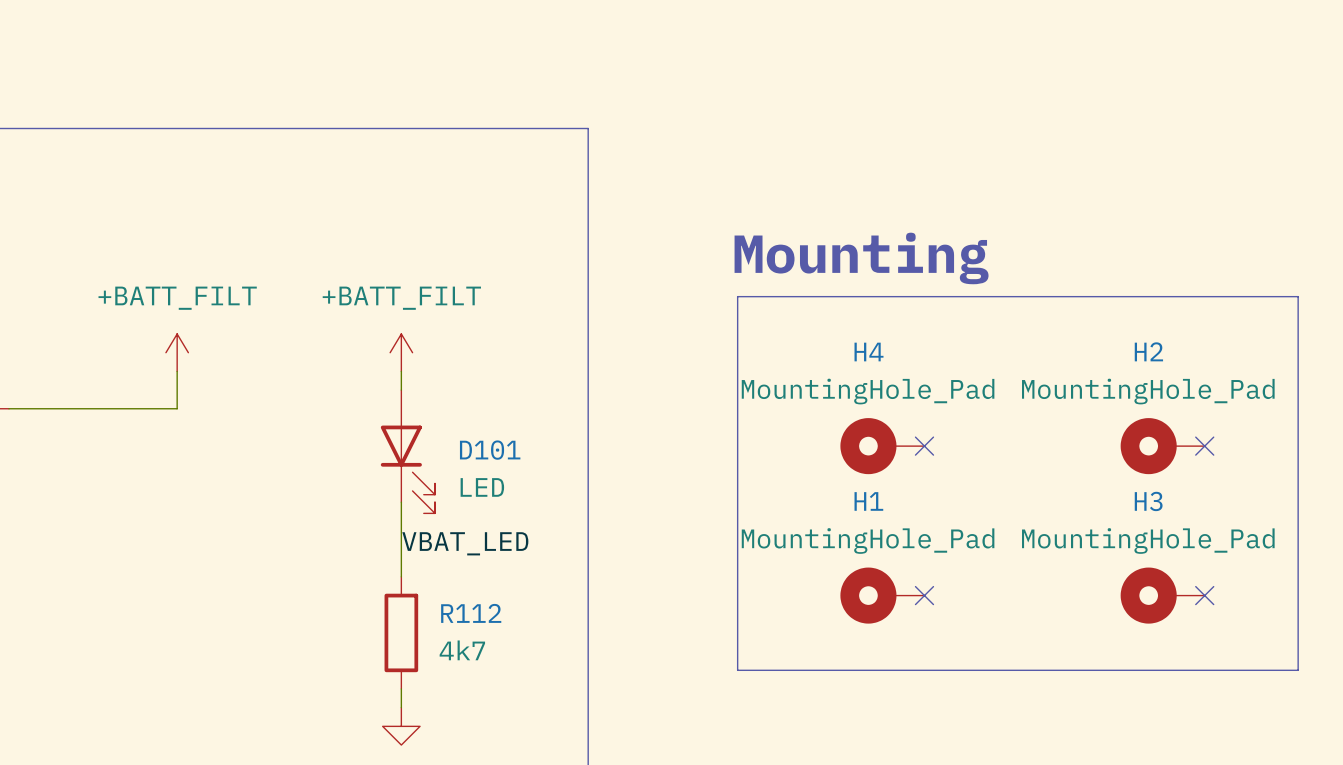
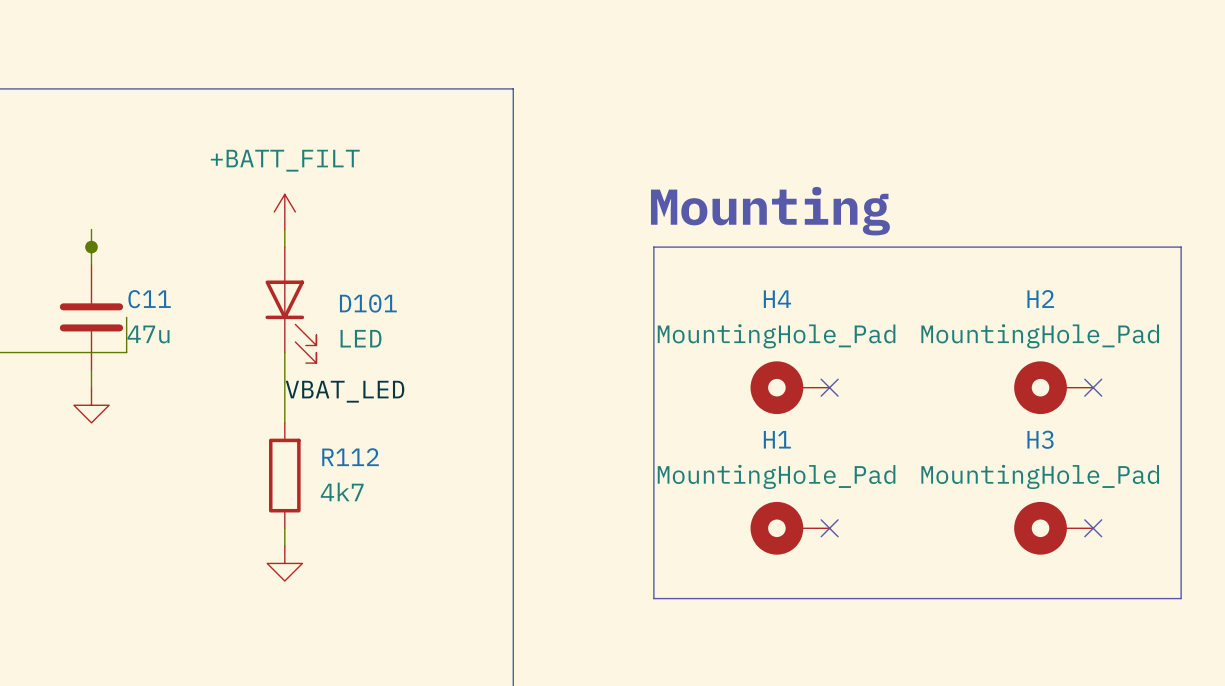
power symbol: none -> +BATT_FILT (284, 211)
wire: none -> (91, 229) (91, 264)
junction: none -> (91, 247)
power symbol: +BATT_FILT (177, 352) -> none
power symbol: +BATT_FILT (401, 352) -> none
C11: none -> 47u (91, 317)
wire: (401, 371) (401, 390) -> (284, 229) (284, 247)
wire: none -> (91, 370) (91, 387)
D101 position: (407, 451) -> (290, 305)
power symbol: none -> (91, 405)
wire: (401, 502) (401, 576) -> (284, 352) (284, 422)
label position: VBAT_LED (465, 543) -> VBAT_LED (344, 391)
R112 position: (401, 632) -> (284, 475)
wire: (401, 688) (401, 707) -> (284, 528) (284, 545)
power symbol position: (401, 726) -> (284, 563)

